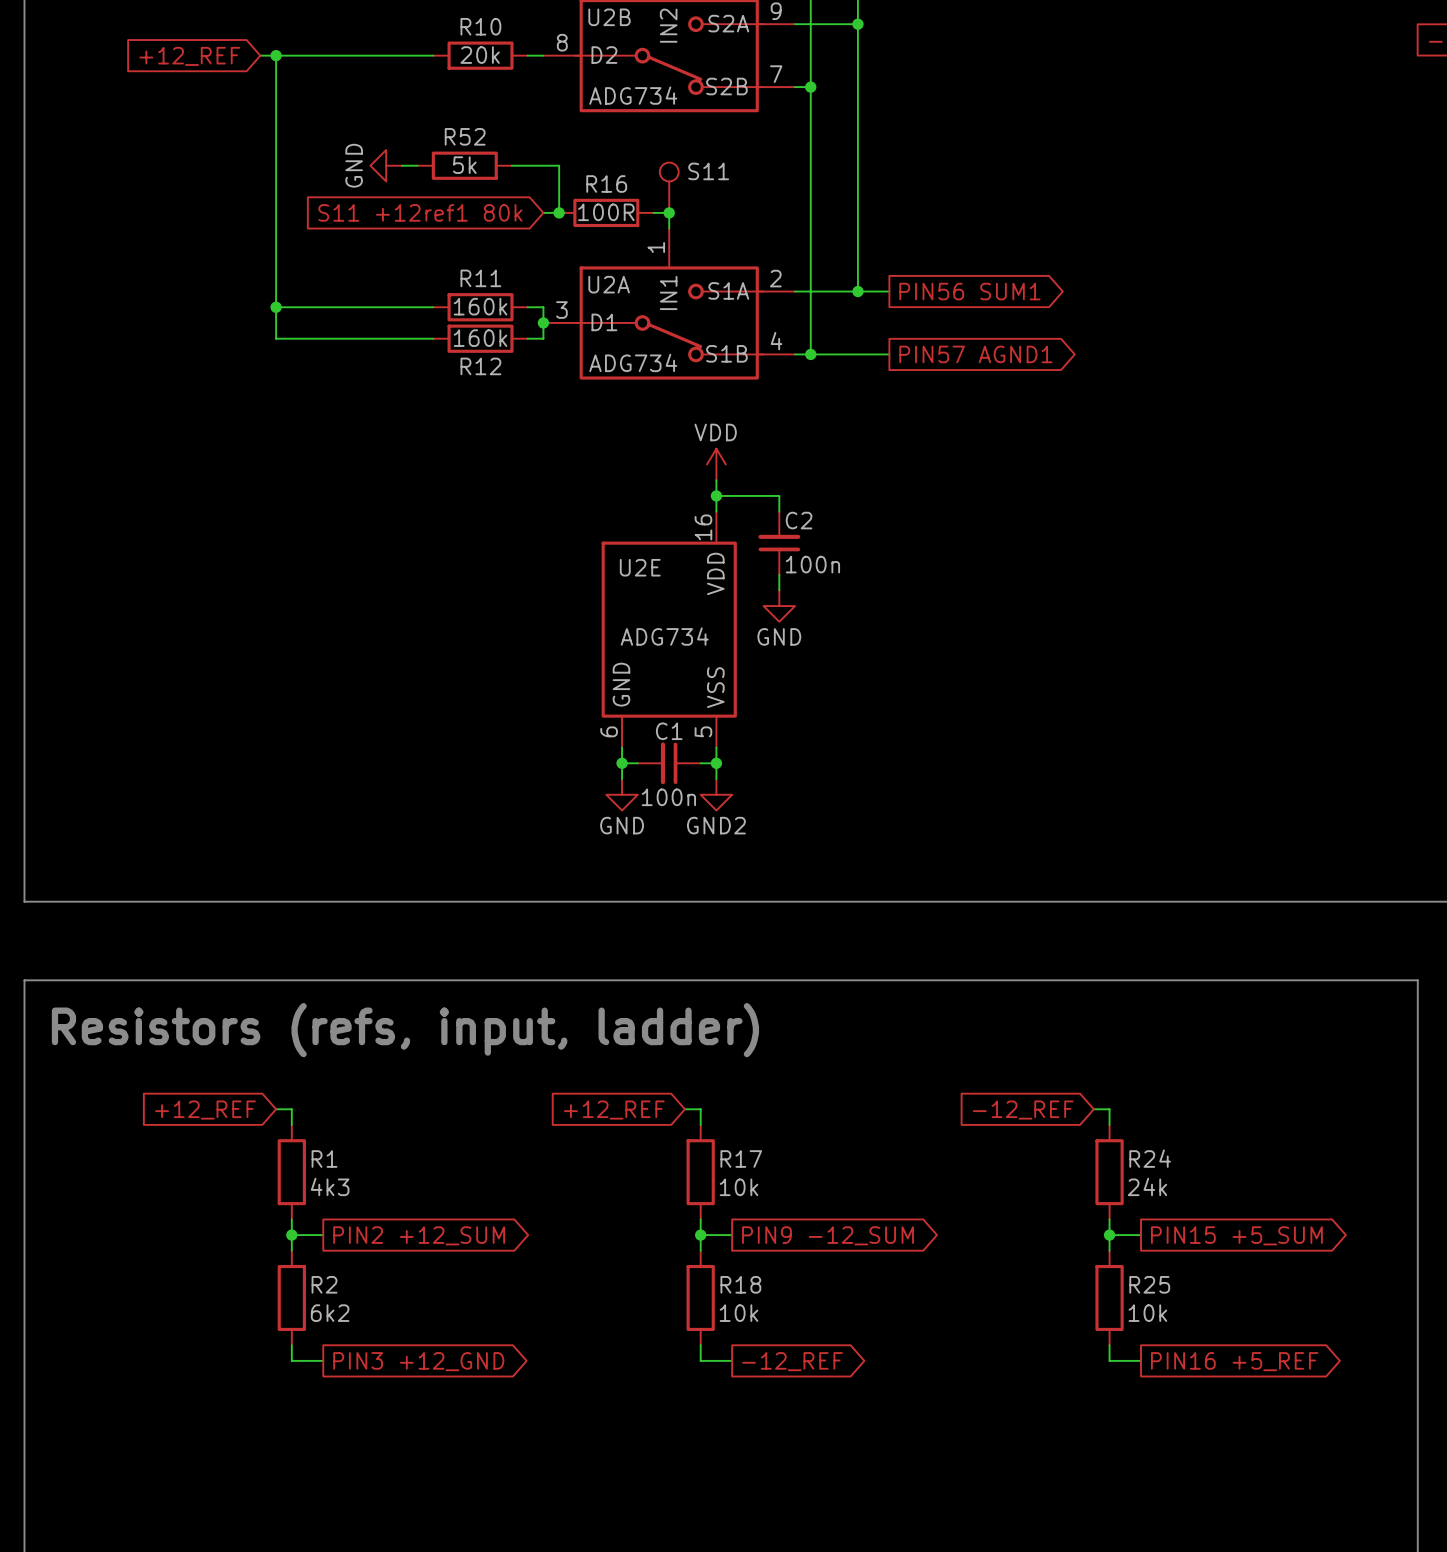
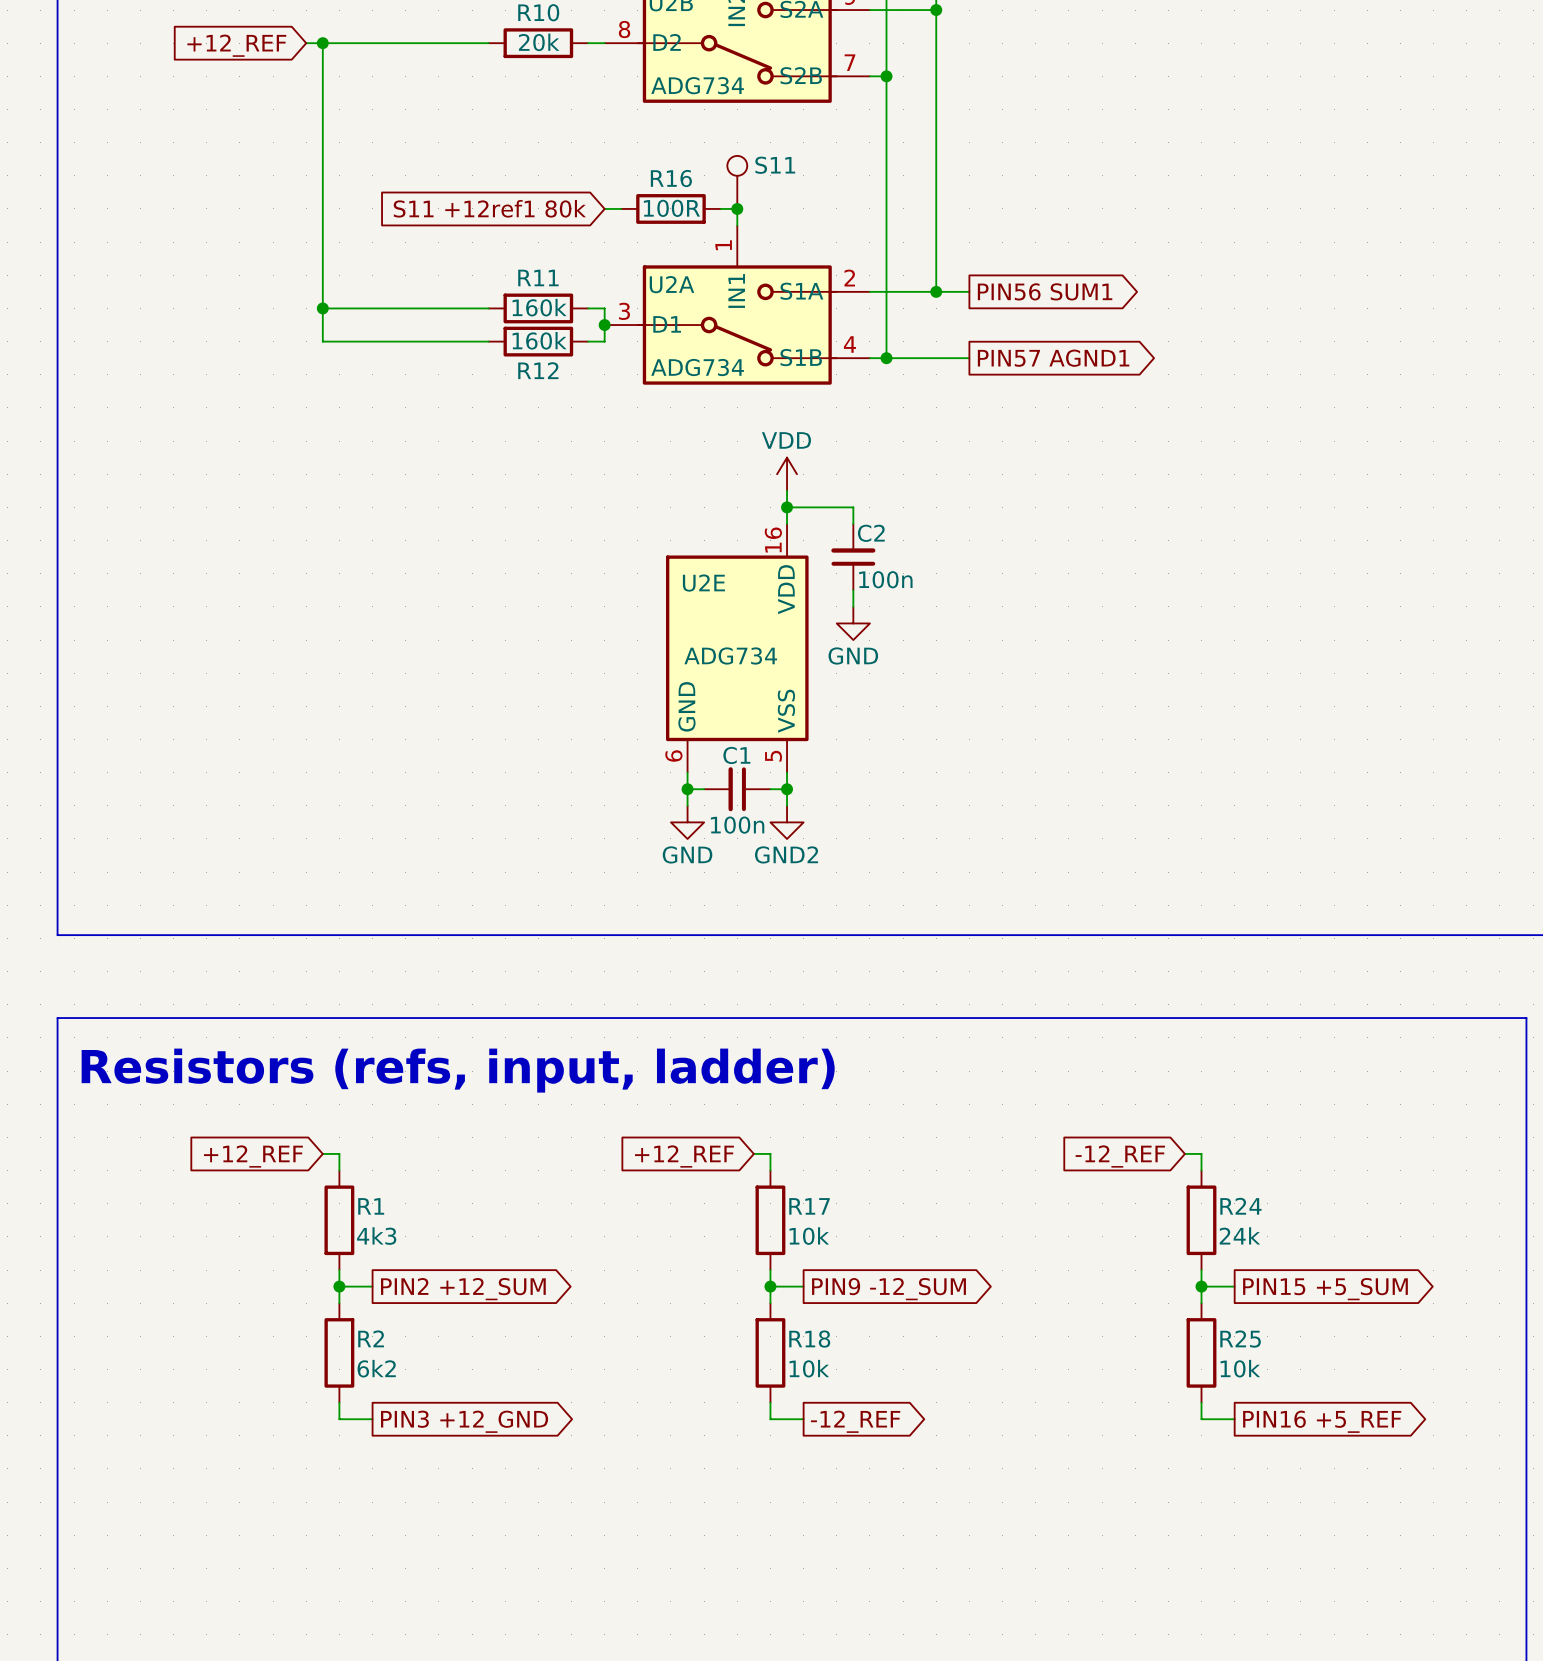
power symbol: GND (386, 165) -> none
wire: (401, 165) (417, 165) -> none
R52: 5k (464, 165) -> none
wire: (511, 165) (559, 165) (559, 212) -> none
junction: (559, 212) -> none

